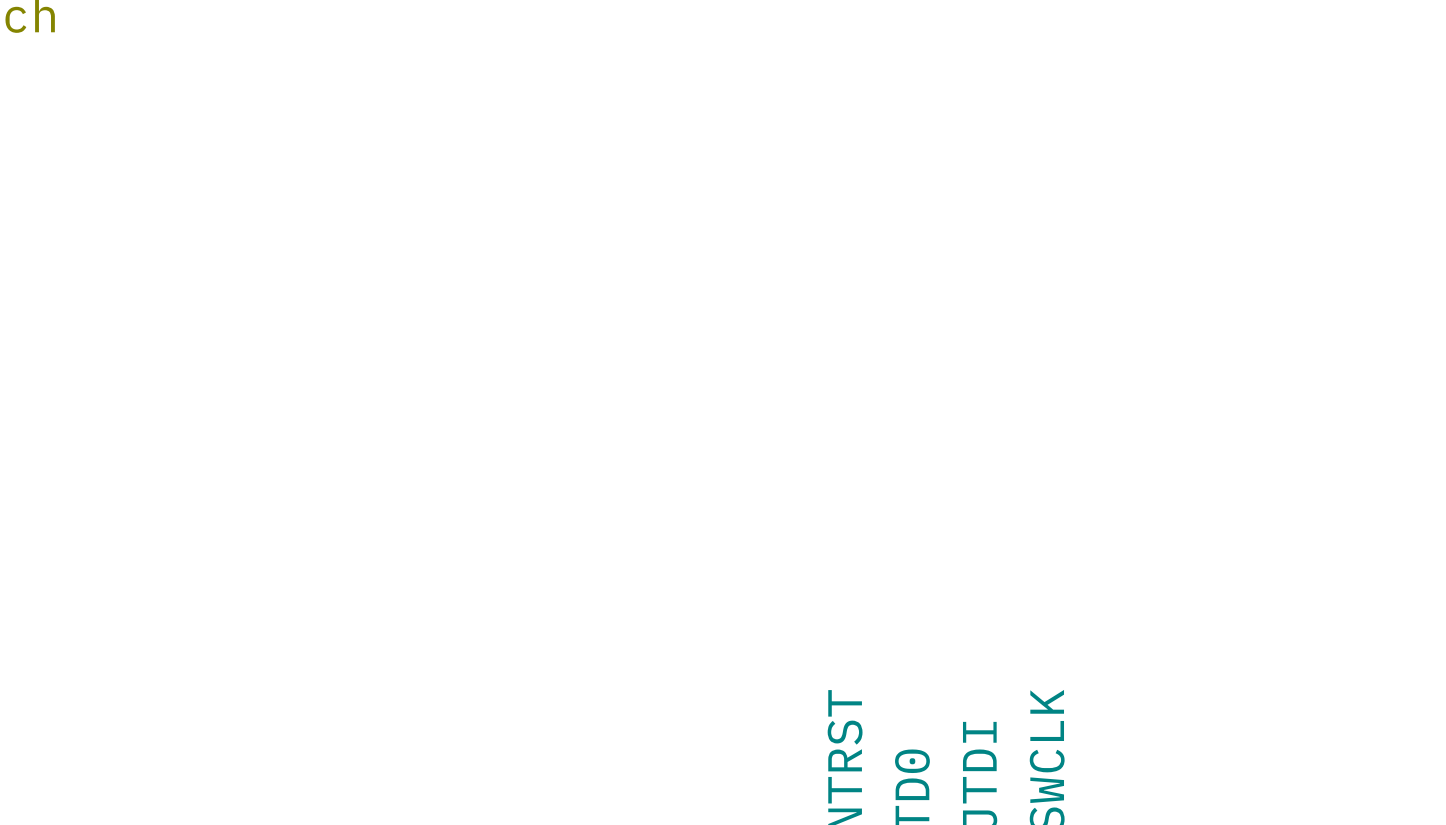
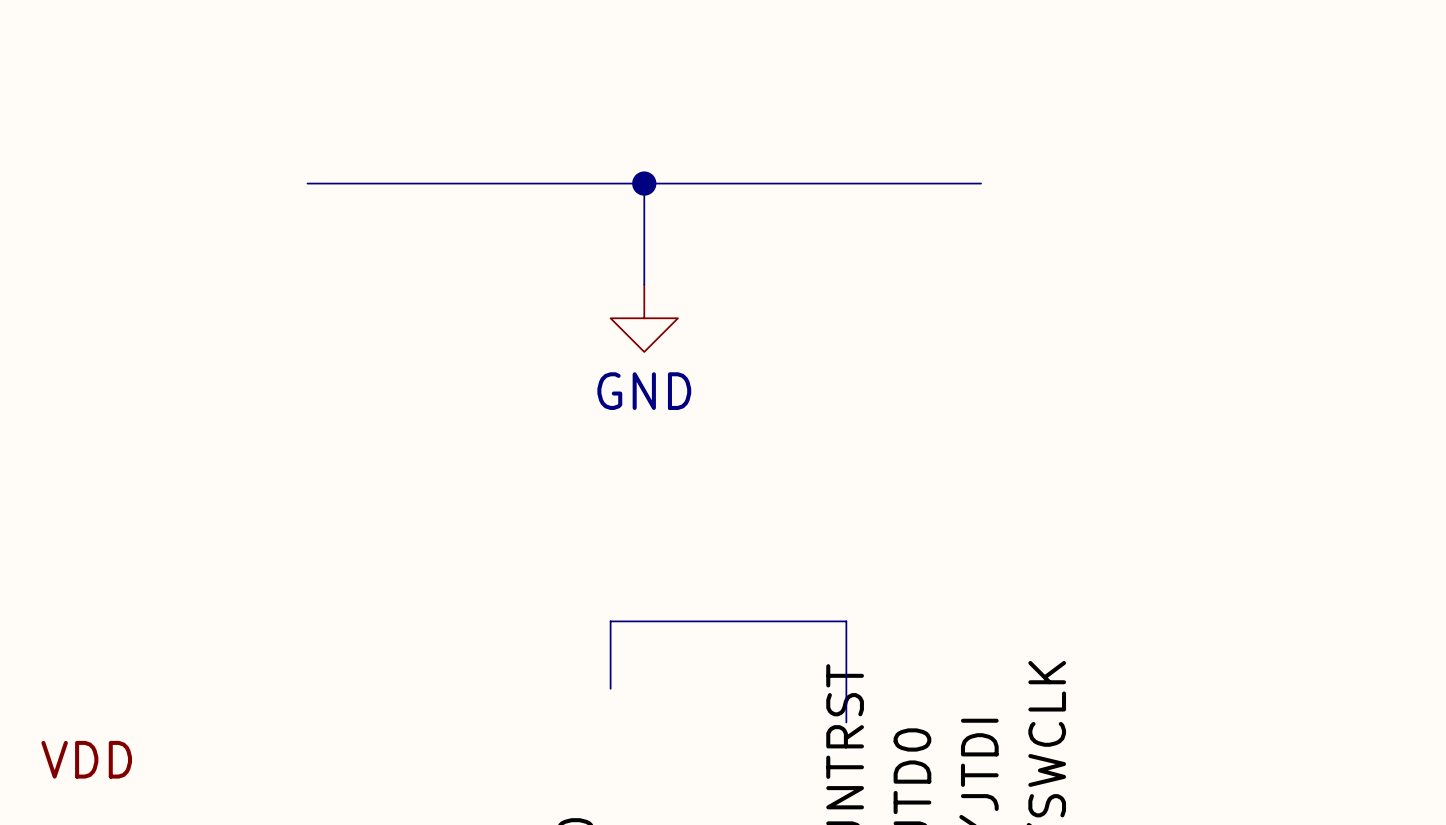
wire: none -> (307, 183) (981, 183)
wire: none -> (644, 183) (644, 284)
junction: none -> (644, 183)
power symbol: none -> GND (644, 318)
wire: none -> (610, 688) (610, 621) (846, 621) (846, 722)
label: none -> VDD (86, 759)

